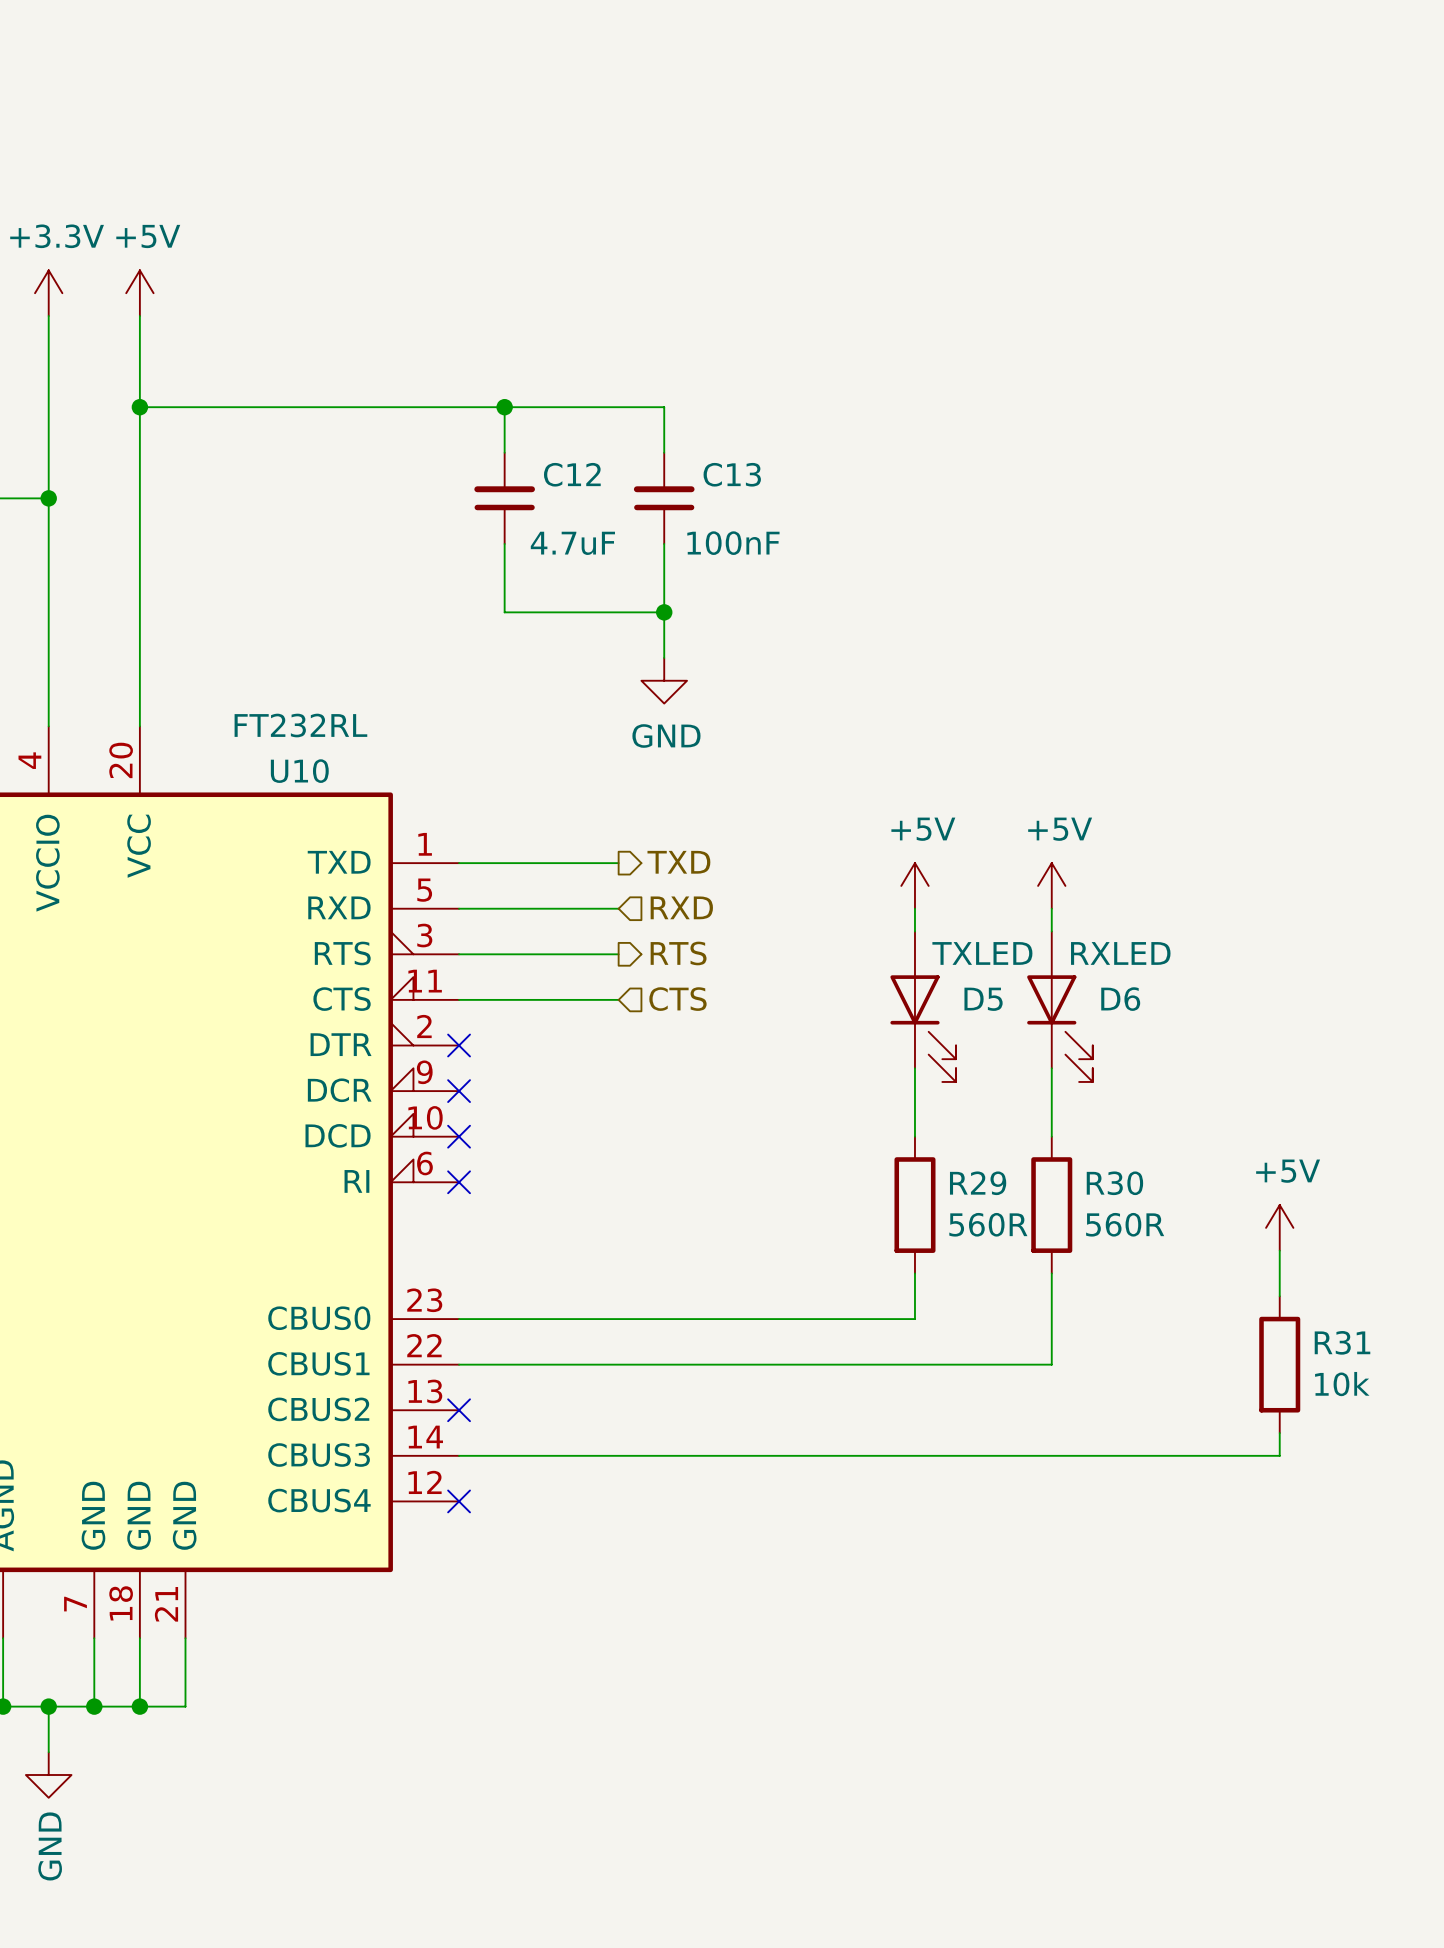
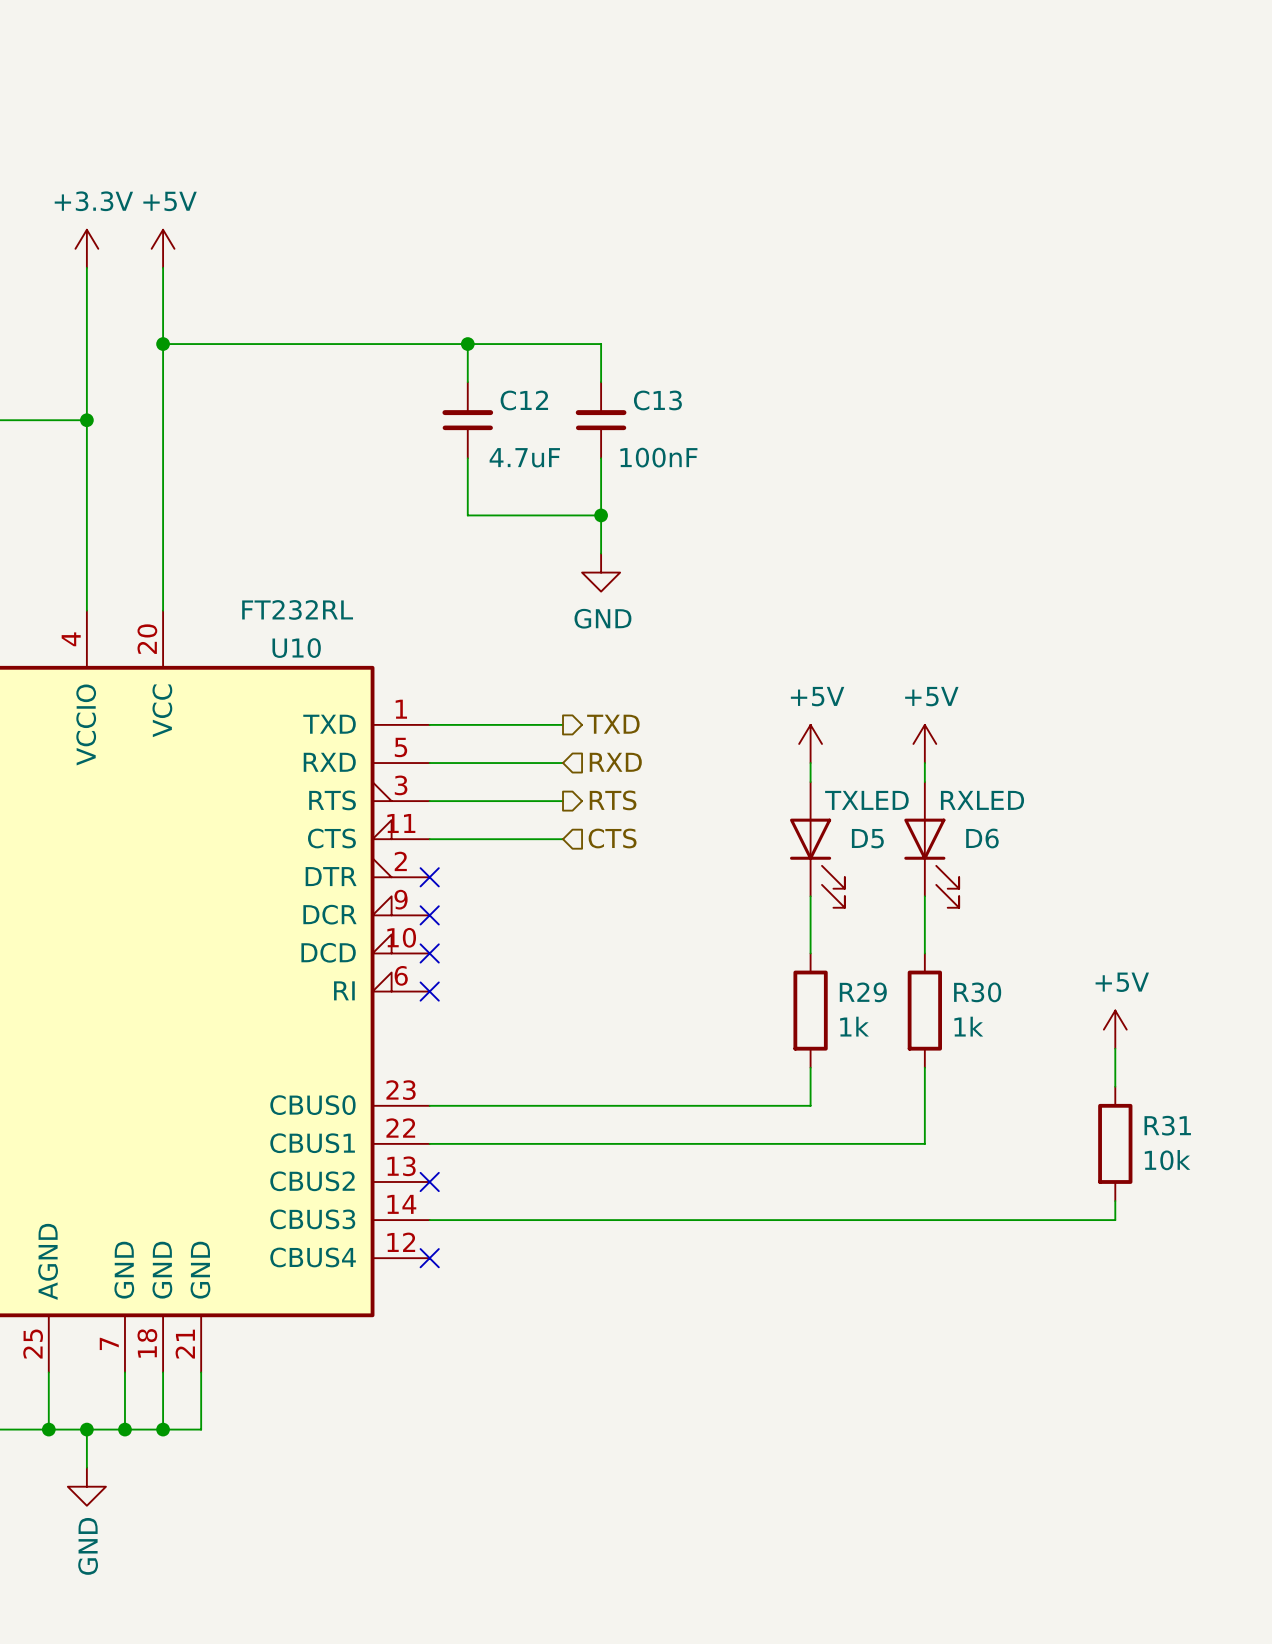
R29 value: 560R (988, 1224) -> 1k (854, 1026)
R30 value: 560R (1125, 1224) -> 1k (968, 1026)

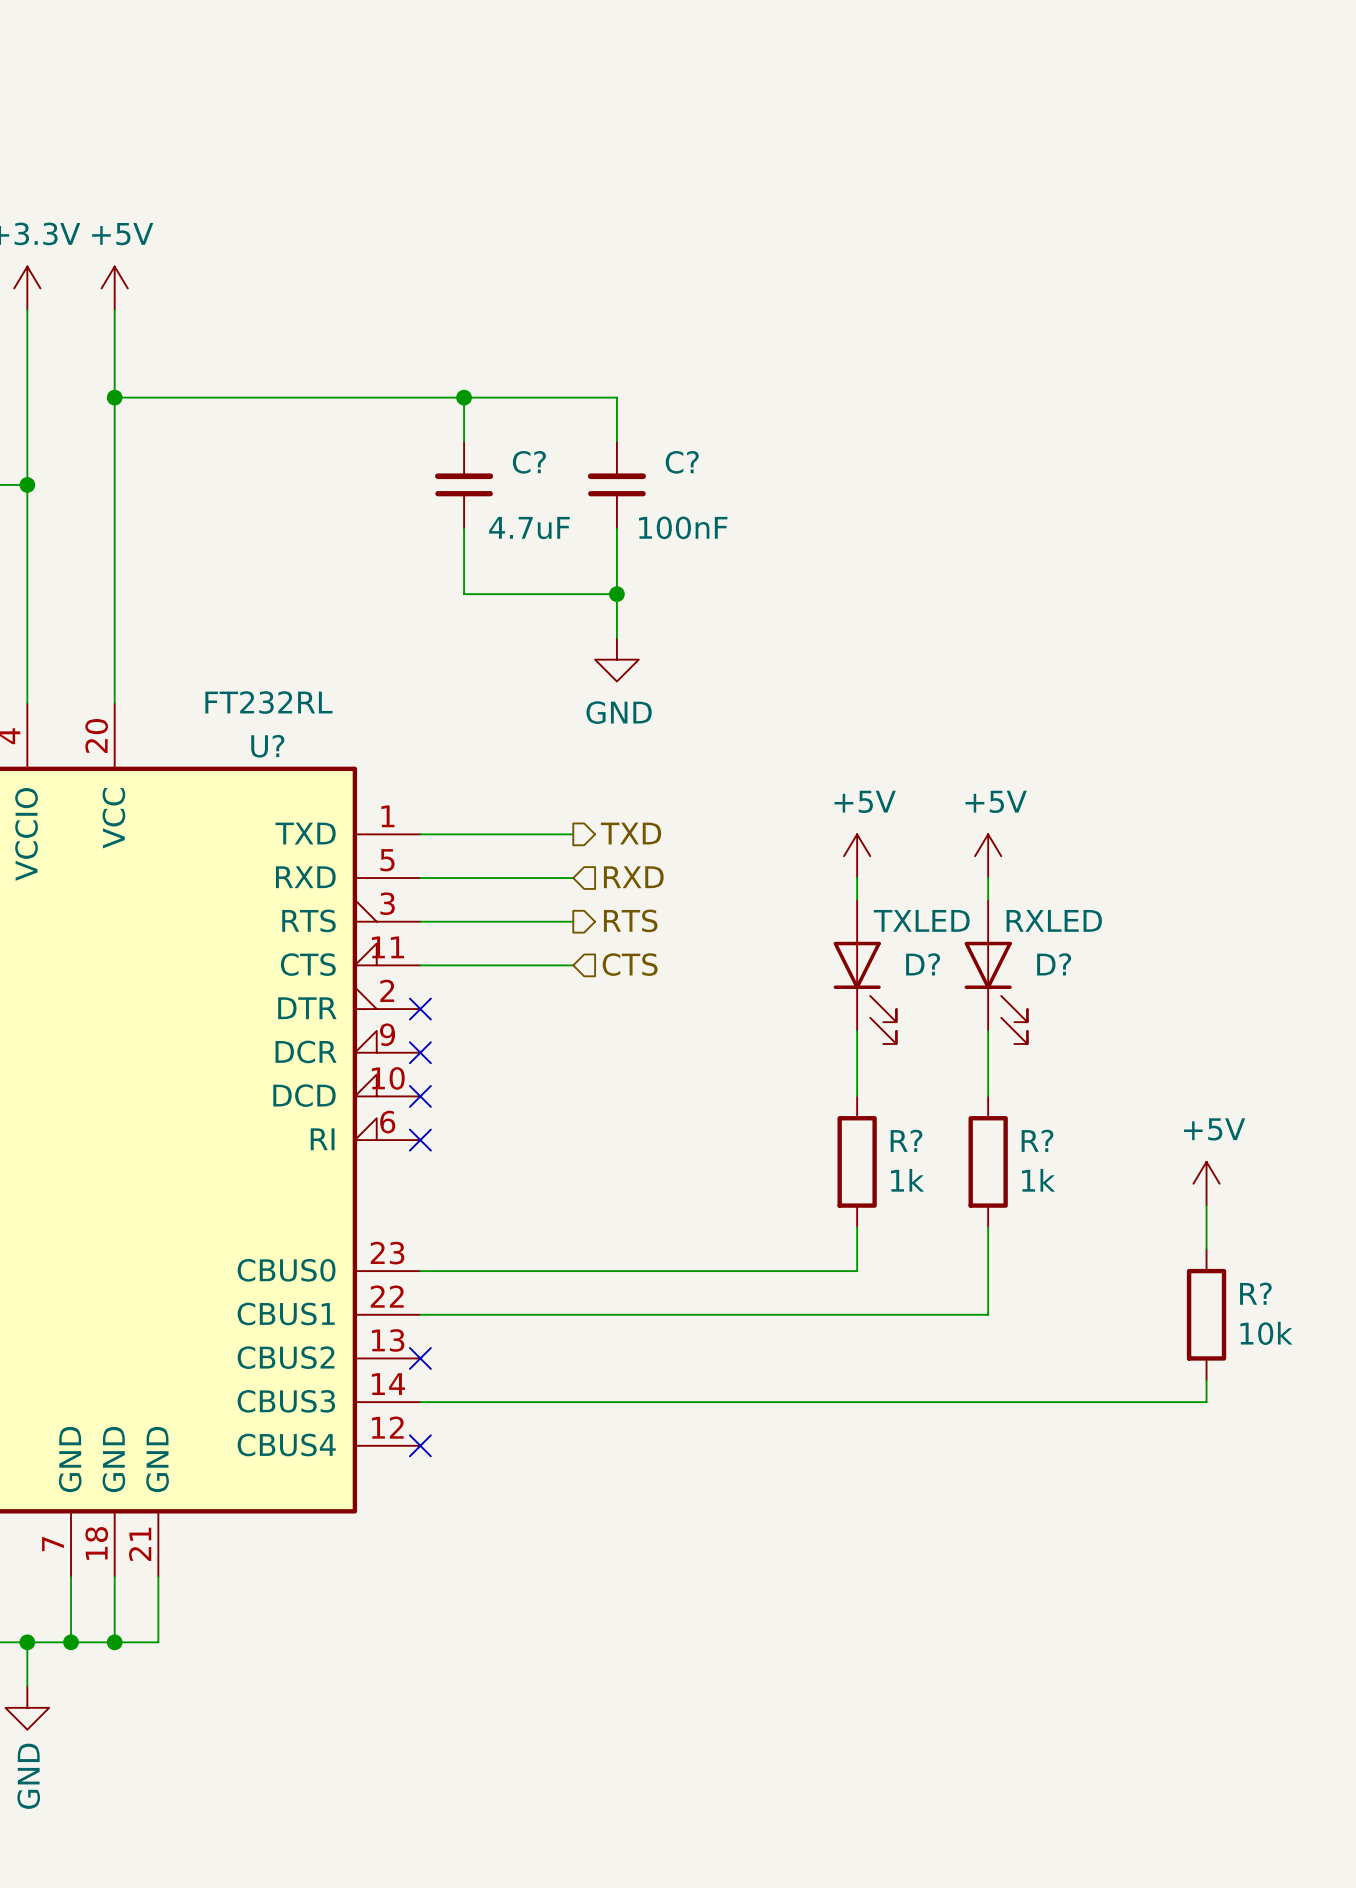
C12 name: C12 (524, 400) -> C? (529, 462)
C13 name: C13 (657, 400) -> C? (682, 462)
U10 name: U10 (296, 648) -> U? (267, 746)
D5 name: D5 (867, 838) -> D? (923, 964)
D6 name: D6 (982, 838) -> D? (1054, 964)
R29 name: R29 (863, 992) -> R? (906, 1140)
R30 name: R30 (977, 992) -> R? (1037, 1140)
R31 name: R31 (1167, 1125) -> R? (1255, 1293)

